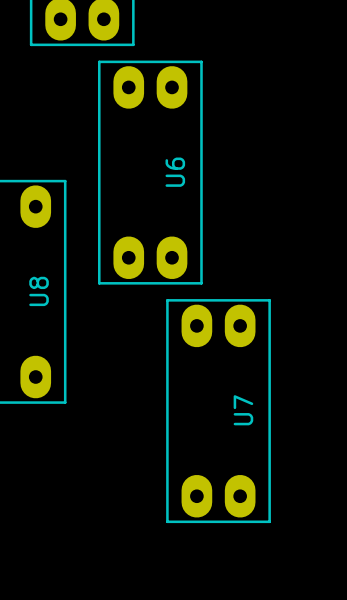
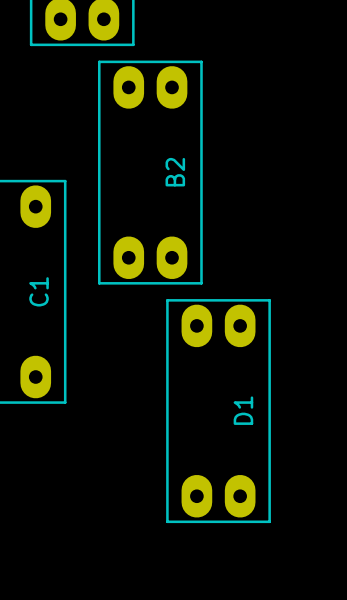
U6 name: U6 (175, 172) -> B2 (175, 172)
U8 name: U8 (39, 291) -> C1 (39, 291)
U7 name: U7 (243, 410) -> D1 (243, 410)

